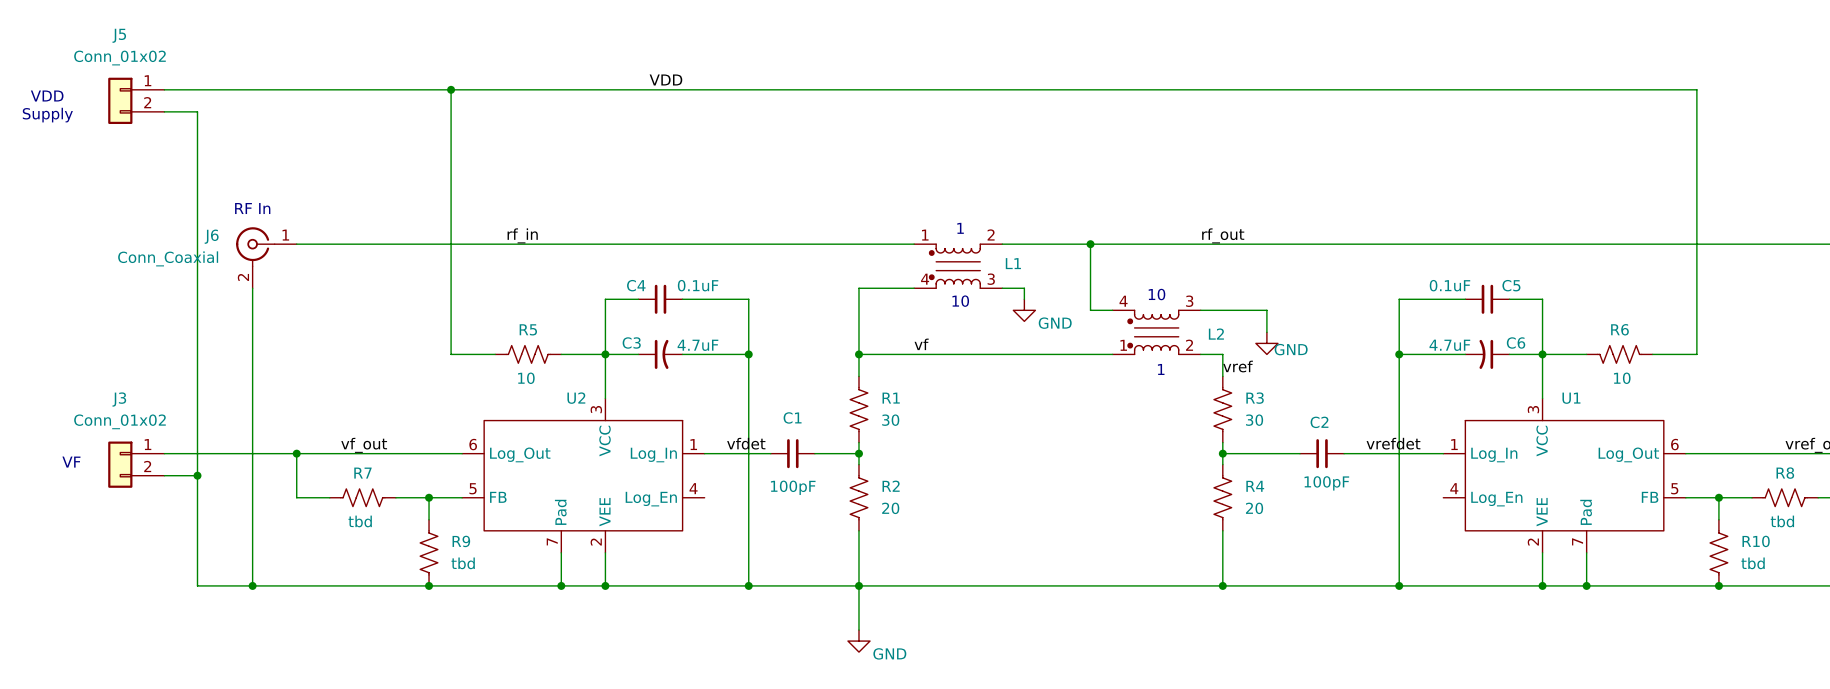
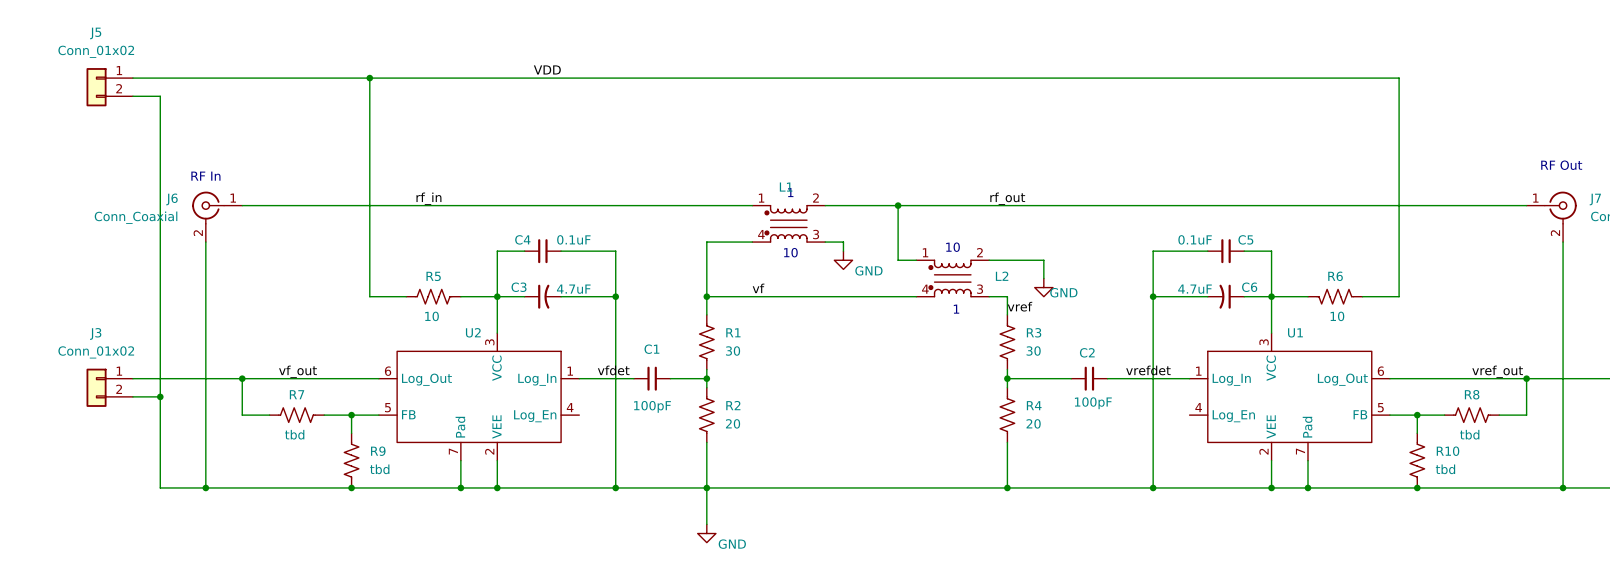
text: VDD (47, 96) -> none
text: Supply (47, 115) -> none
L1 name position: L1 (1013, 263) -> L1 (786, 187)
L2 flip: as is (1153, 332) -> up-down (950, 278)
text: VF (71, 462) -> none

